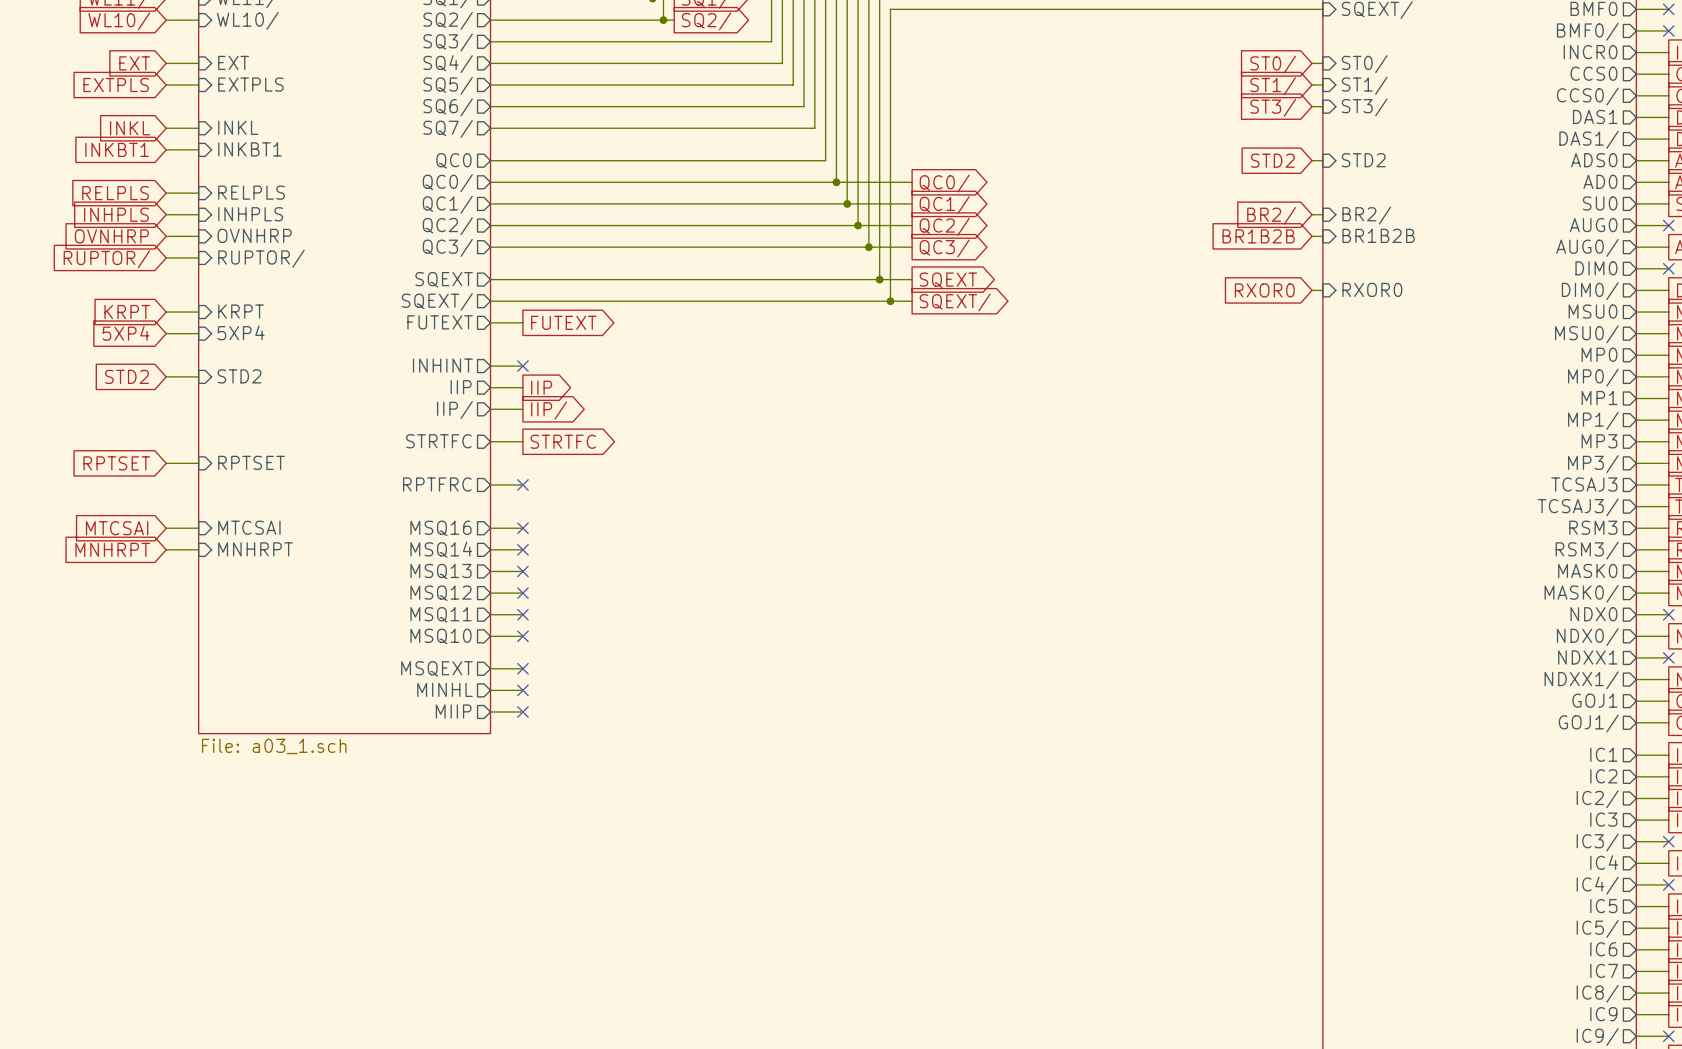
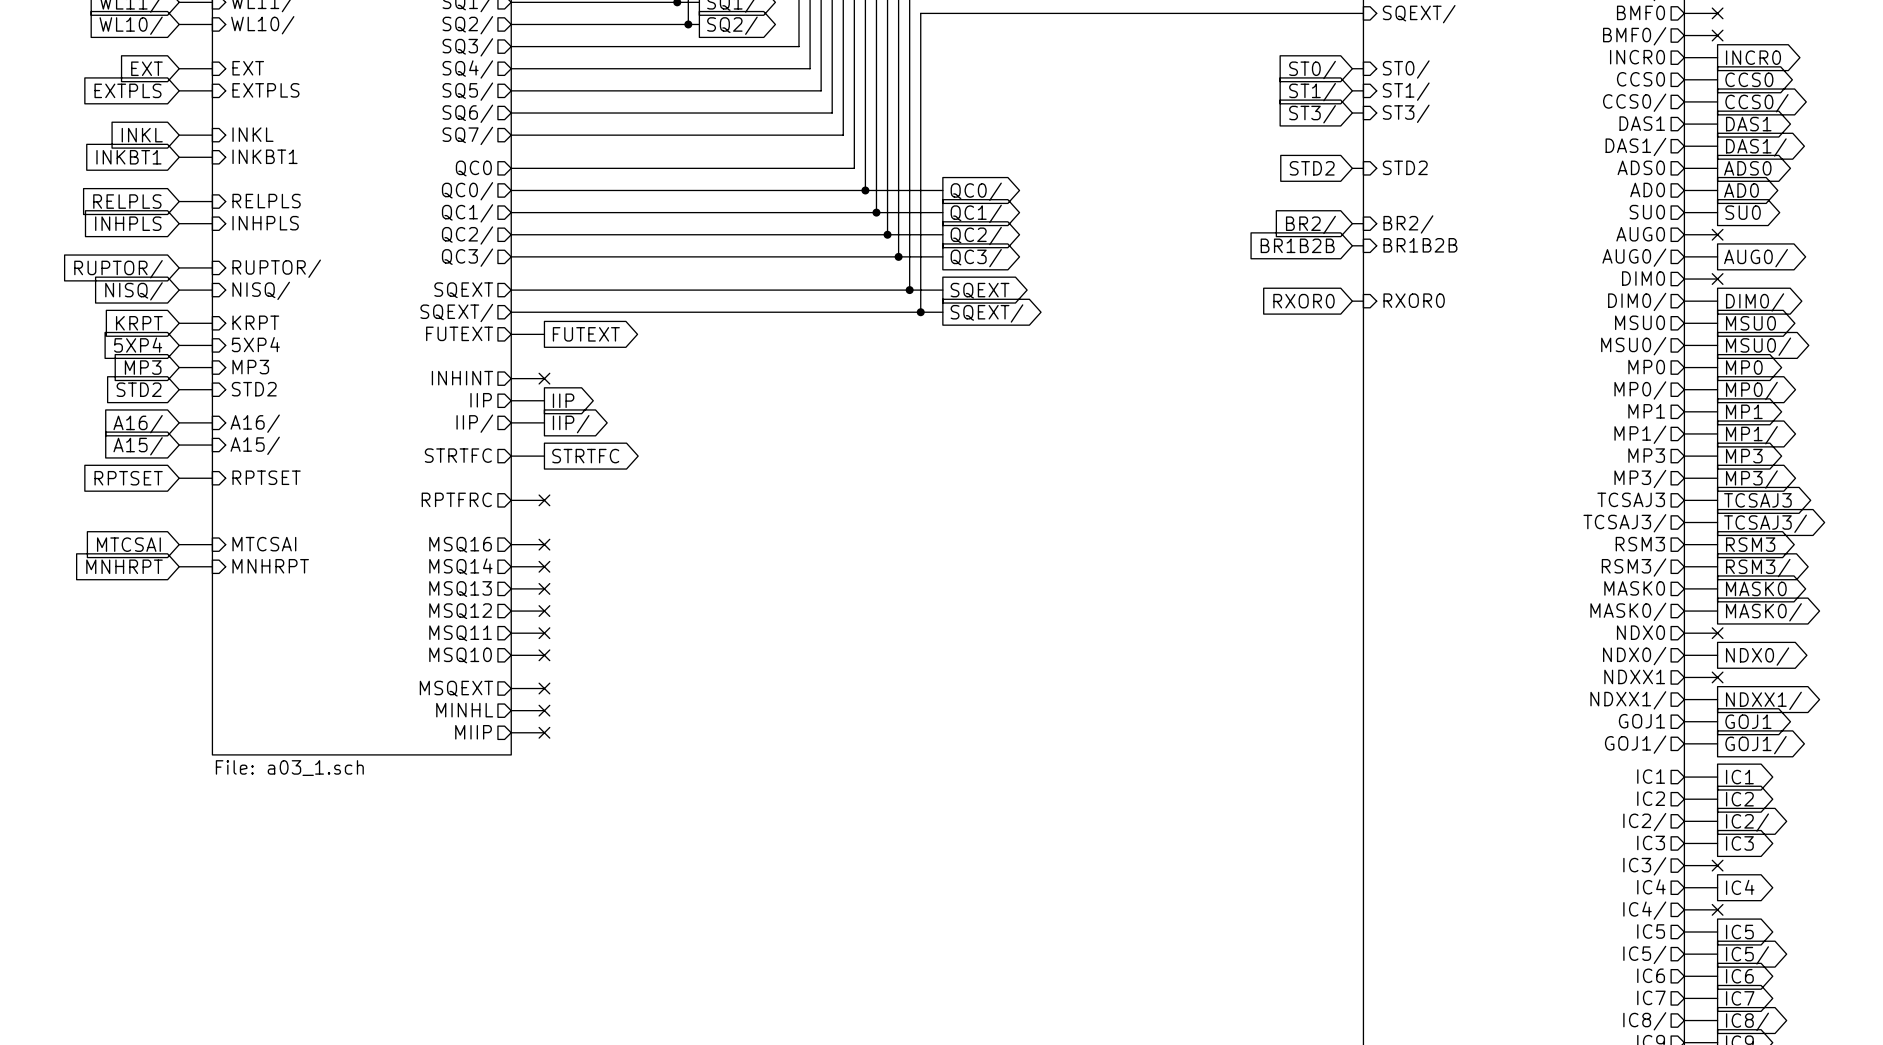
sheet pin: OVNHRP (254, 235) -> none
global label: OVNHRP (111, 236) -> none
wire: (166, 236) (198, 236) -> (179, 290) (212, 290)
global label: none -> NISQ/ (133, 291)
sheet pin: none -> NISQ/ (261, 290)
sheet pin: none -> MP3 (250, 367)
global label: none -> MP3 (143, 367)
wire: none -> (179, 367) (212, 367)
wire: none -> (179, 422) (212, 422)
global label: none -> A16/ (138, 424)
sheet pin: none -> A16/ (255, 423)
wire: none -> (179, 445) (212, 445)
sheet pin: none -> A15/ (255, 445)
global label: none -> A15/ (138, 446)

